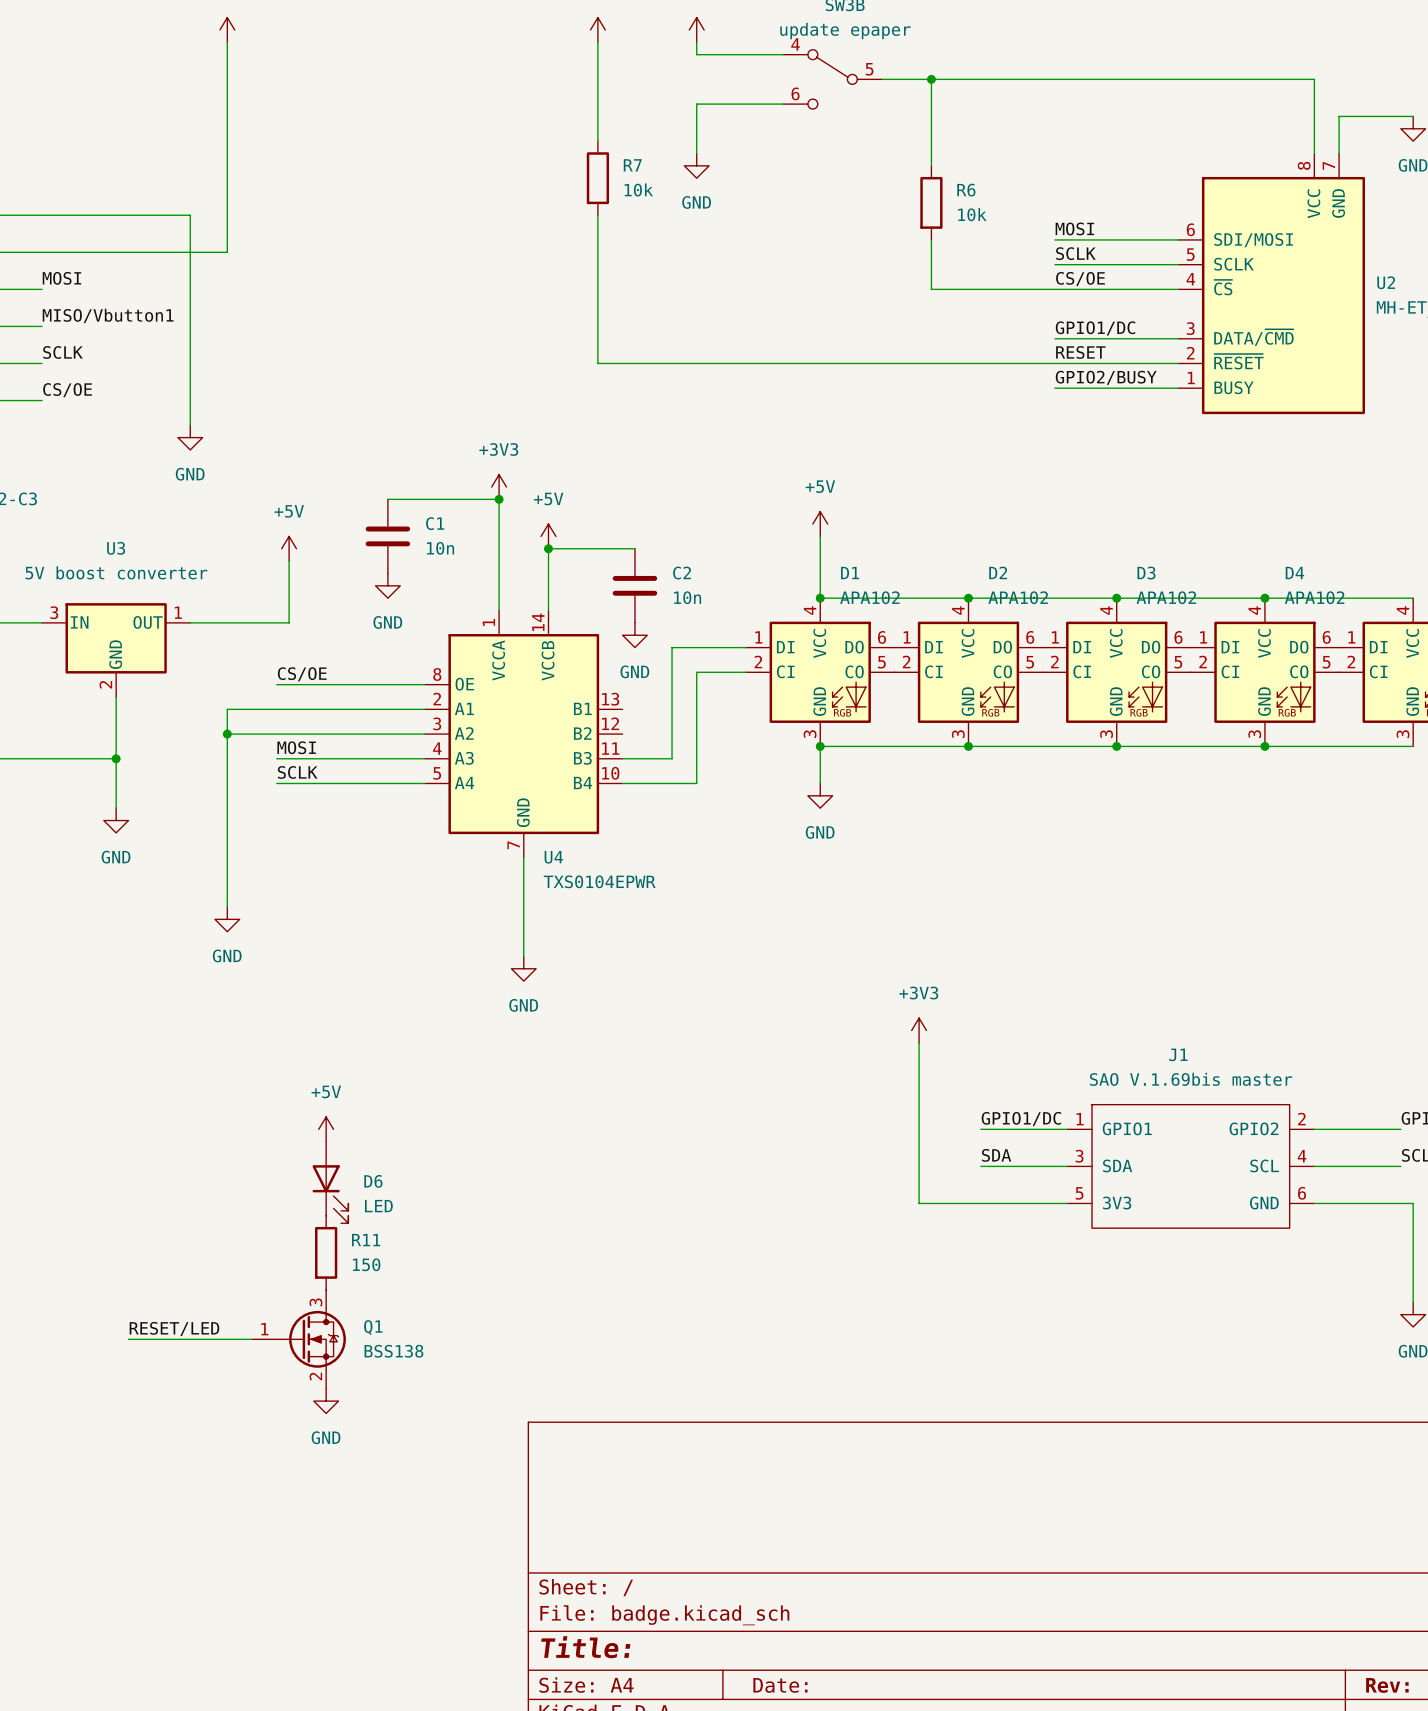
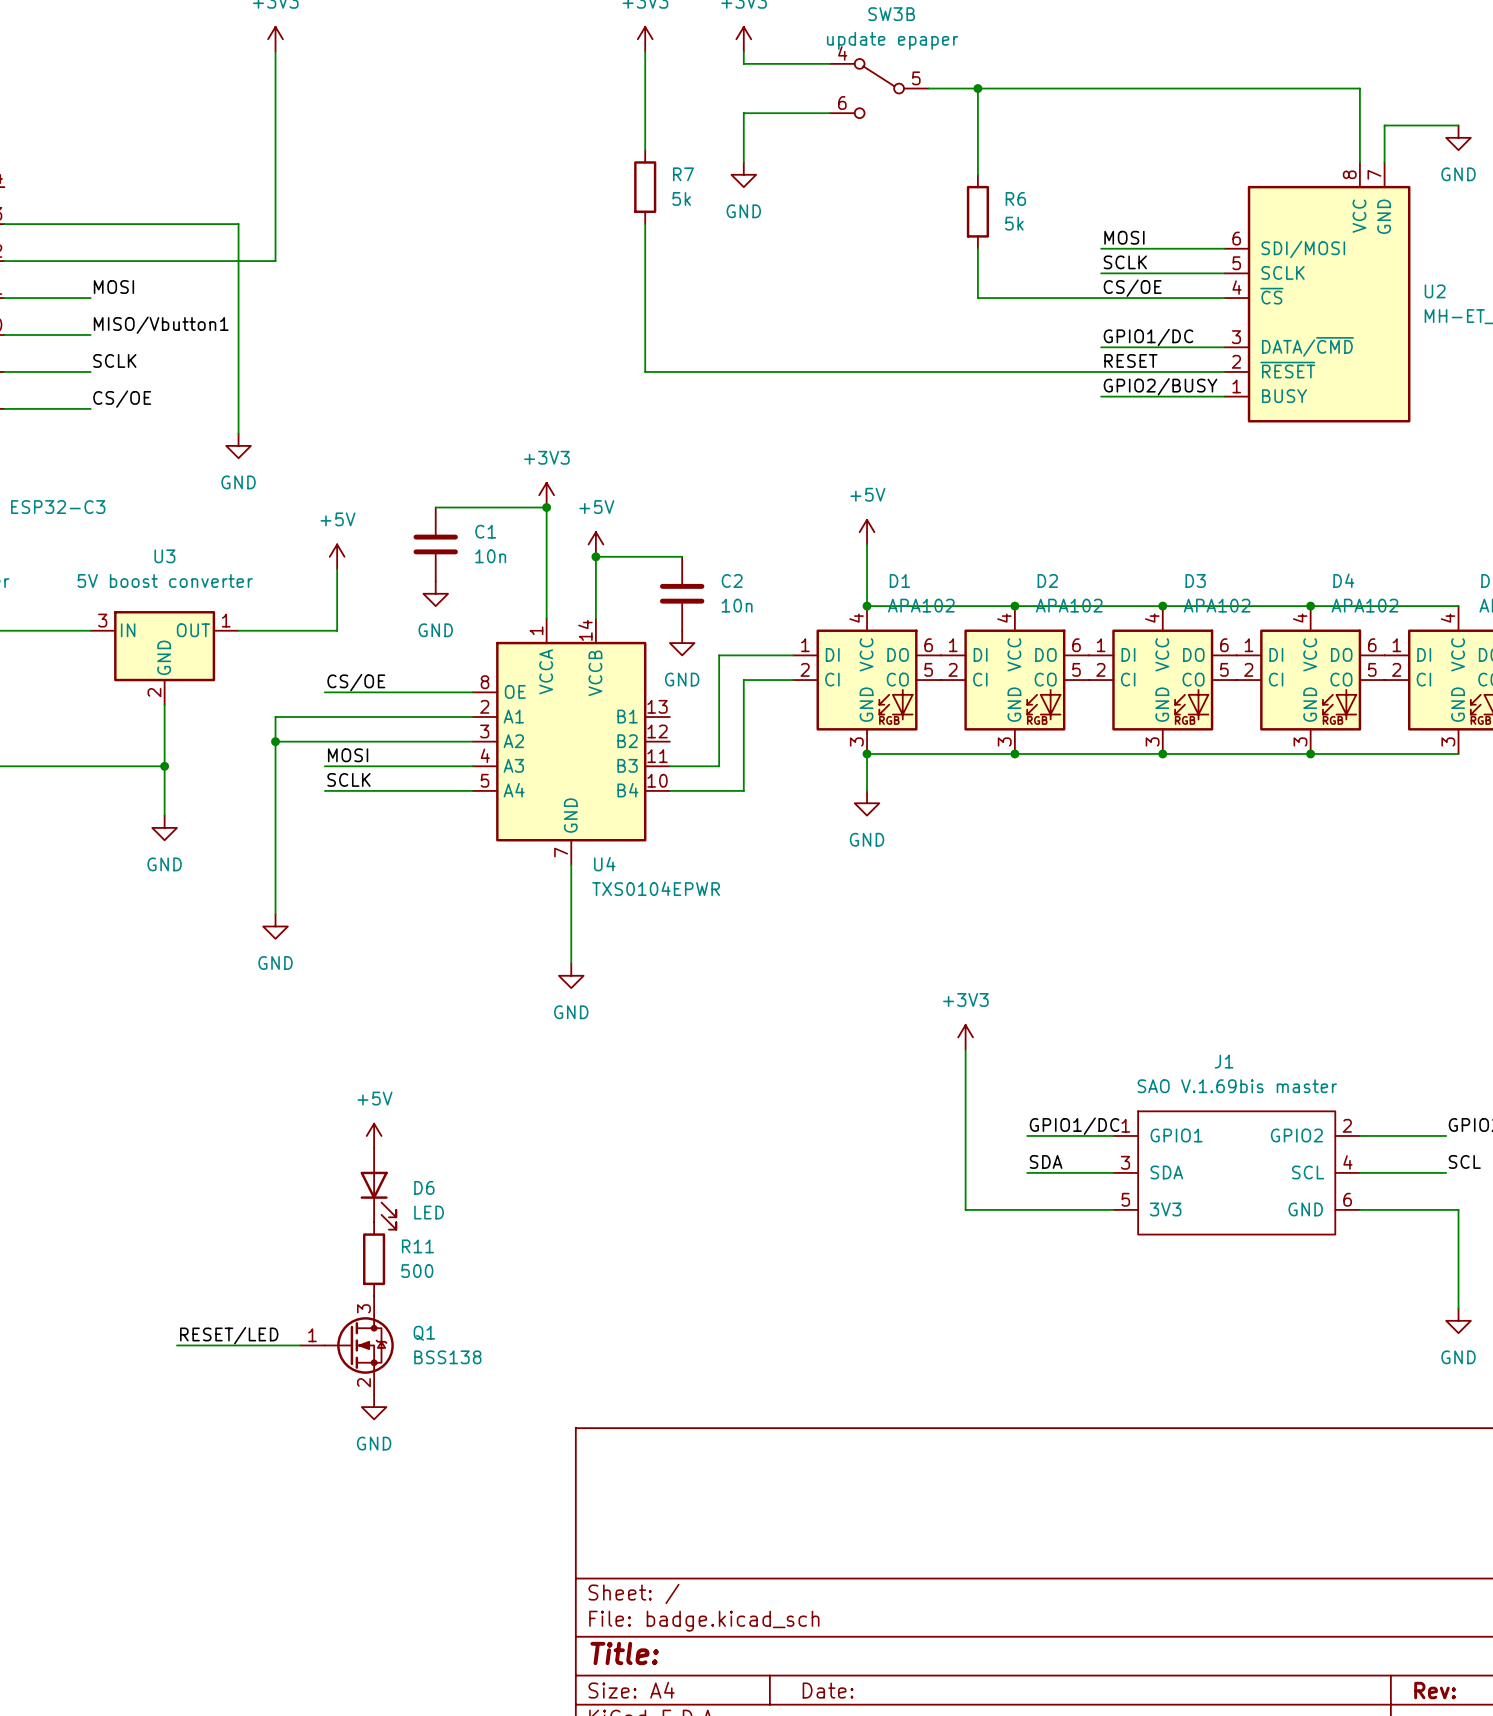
R7 value: 10k (638, 189) -> 5k (681, 198)
R6 value: 10k (972, 214) -> 5k (1014, 223)
R11 value: 150 (366, 1264) -> 500 (417, 1271)

